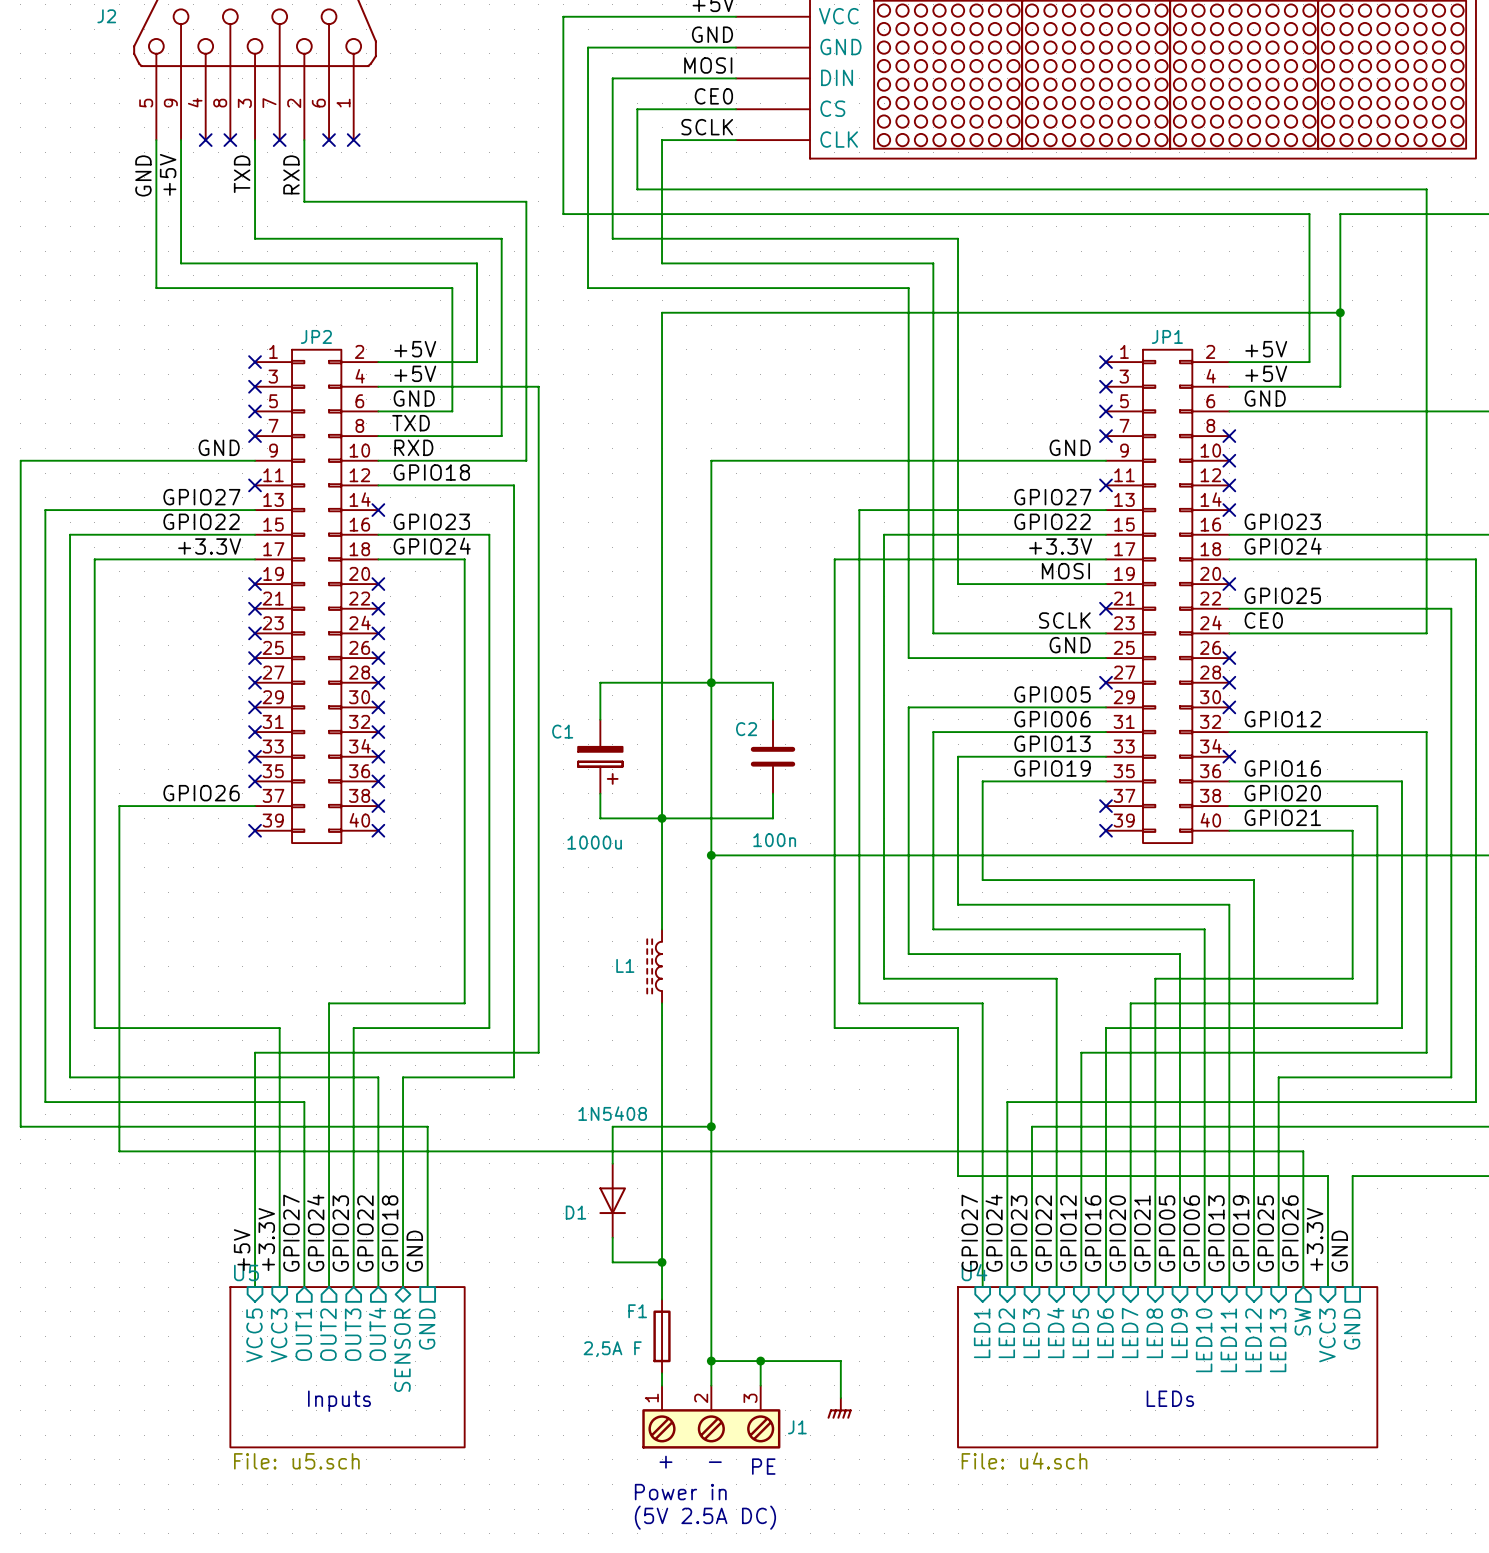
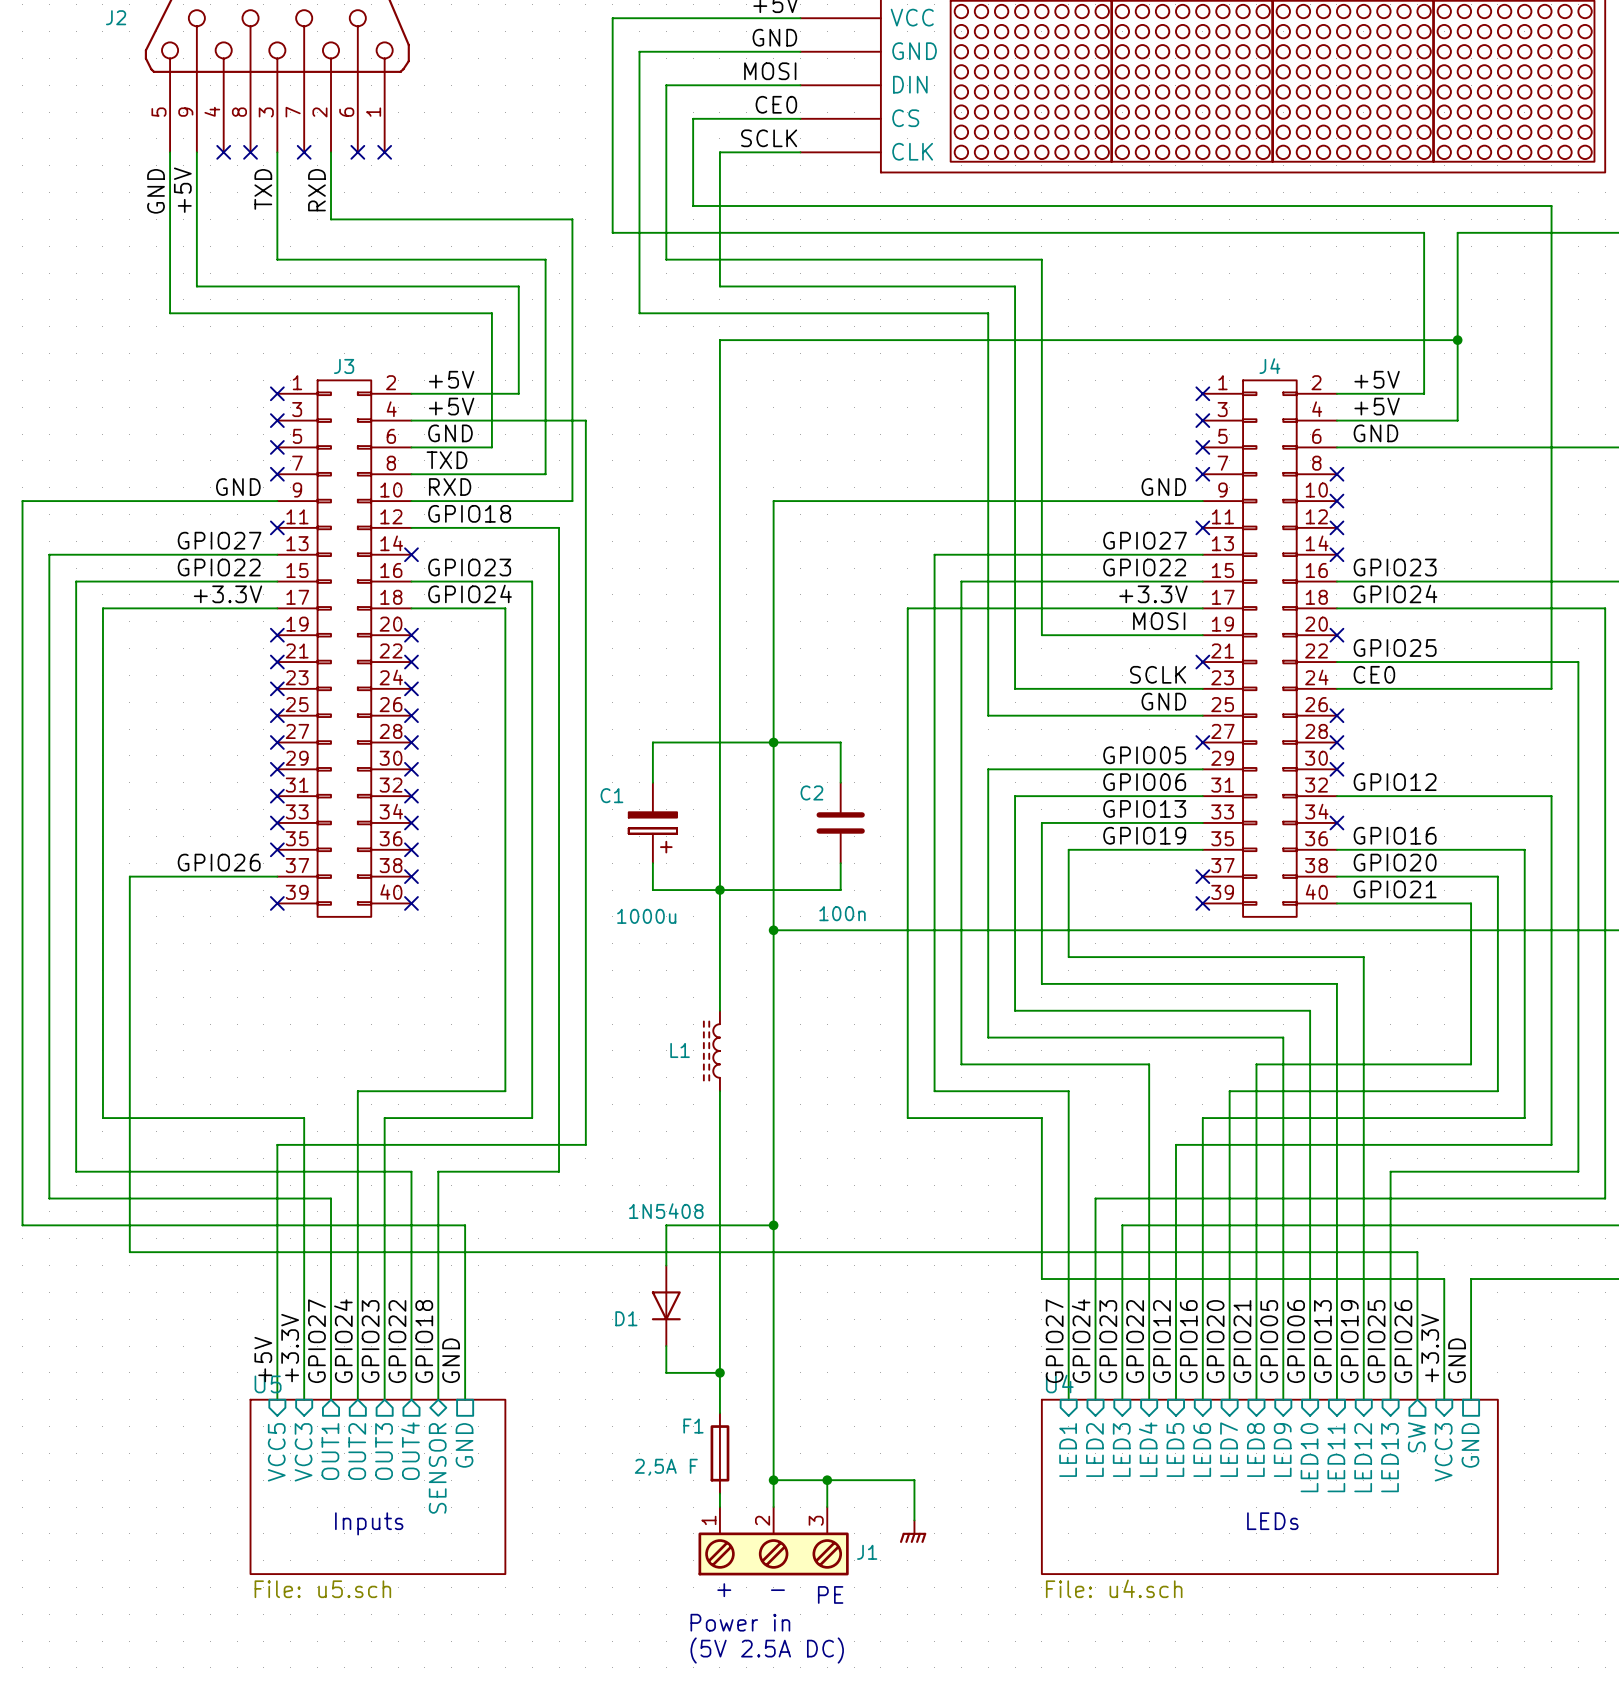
JP2 name: JP2 (316, 336) -> J3 (344, 366)
JP1 name: JP1 (1167, 336) -> J4 (1269, 366)

